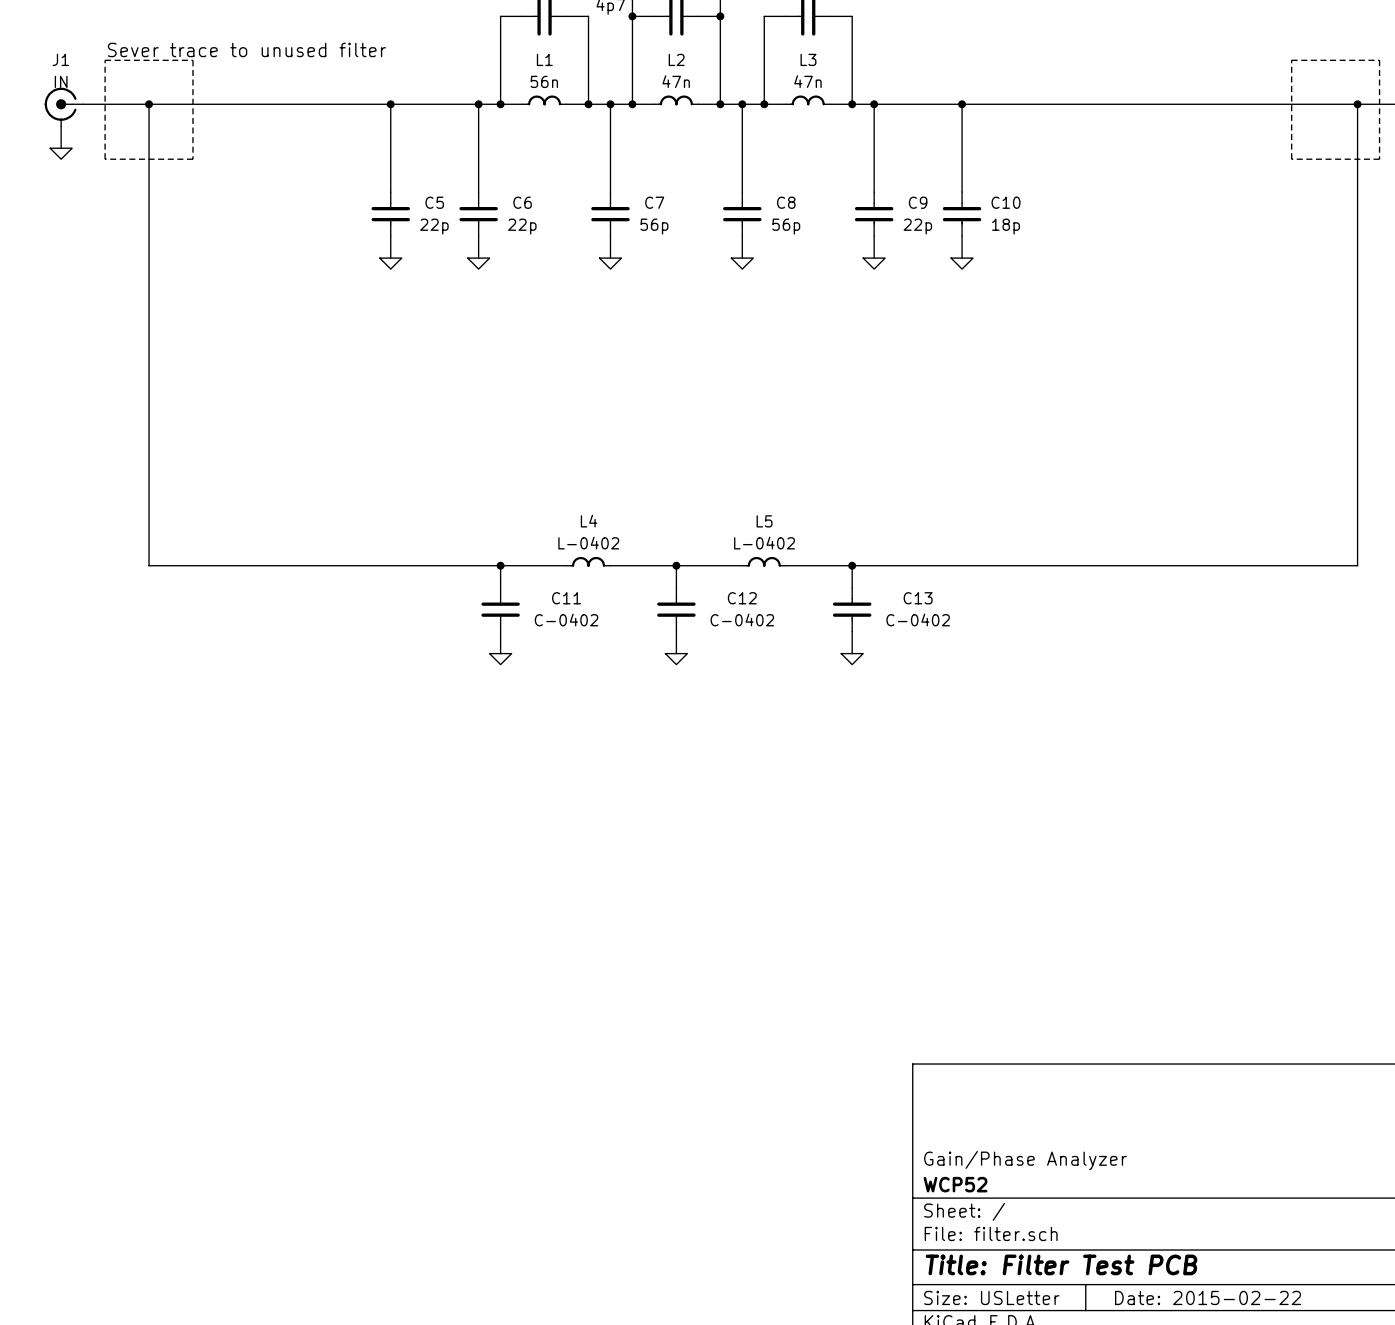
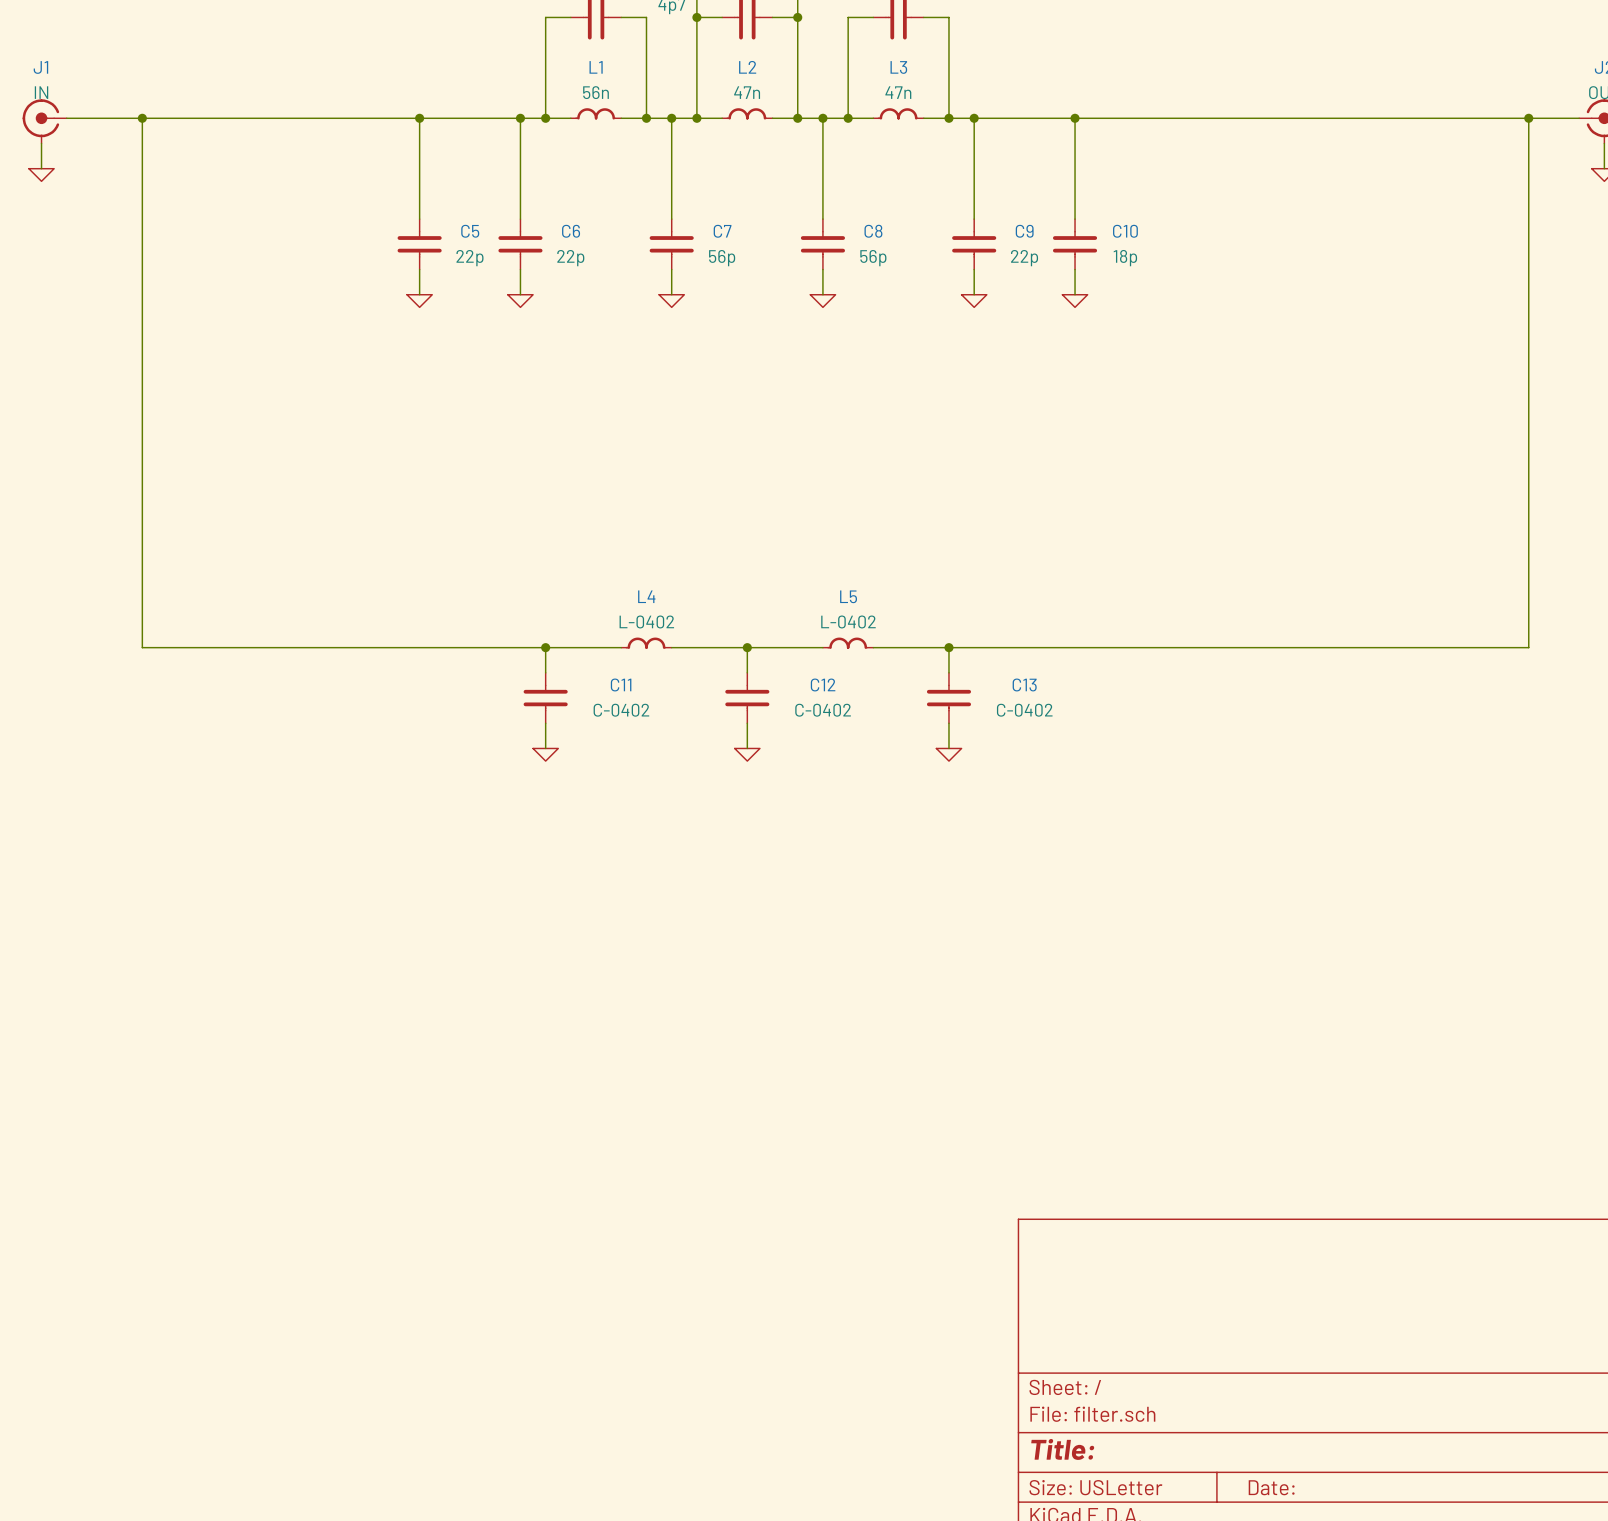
text: Sever trace to unused filter (246, 49) -> none
line: (105, 60) (192, 60) (192, 159) (105, 159) (105, 60) -> none
line: (1291, 60) (1379, 60) (1379, 159) (1291, 159) (1291, 60) -> none
title block: Gain/Phase Analyzer (1025, 1160) -> none
title block: WCP52 (955, 1184) -> none
title block: Title: Filter Test PCB (1061, 1264) -> Title: (1062, 1449)
title block: Date: 2015-02-22 (1208, 1297) -> Date: (1271, 1487)

